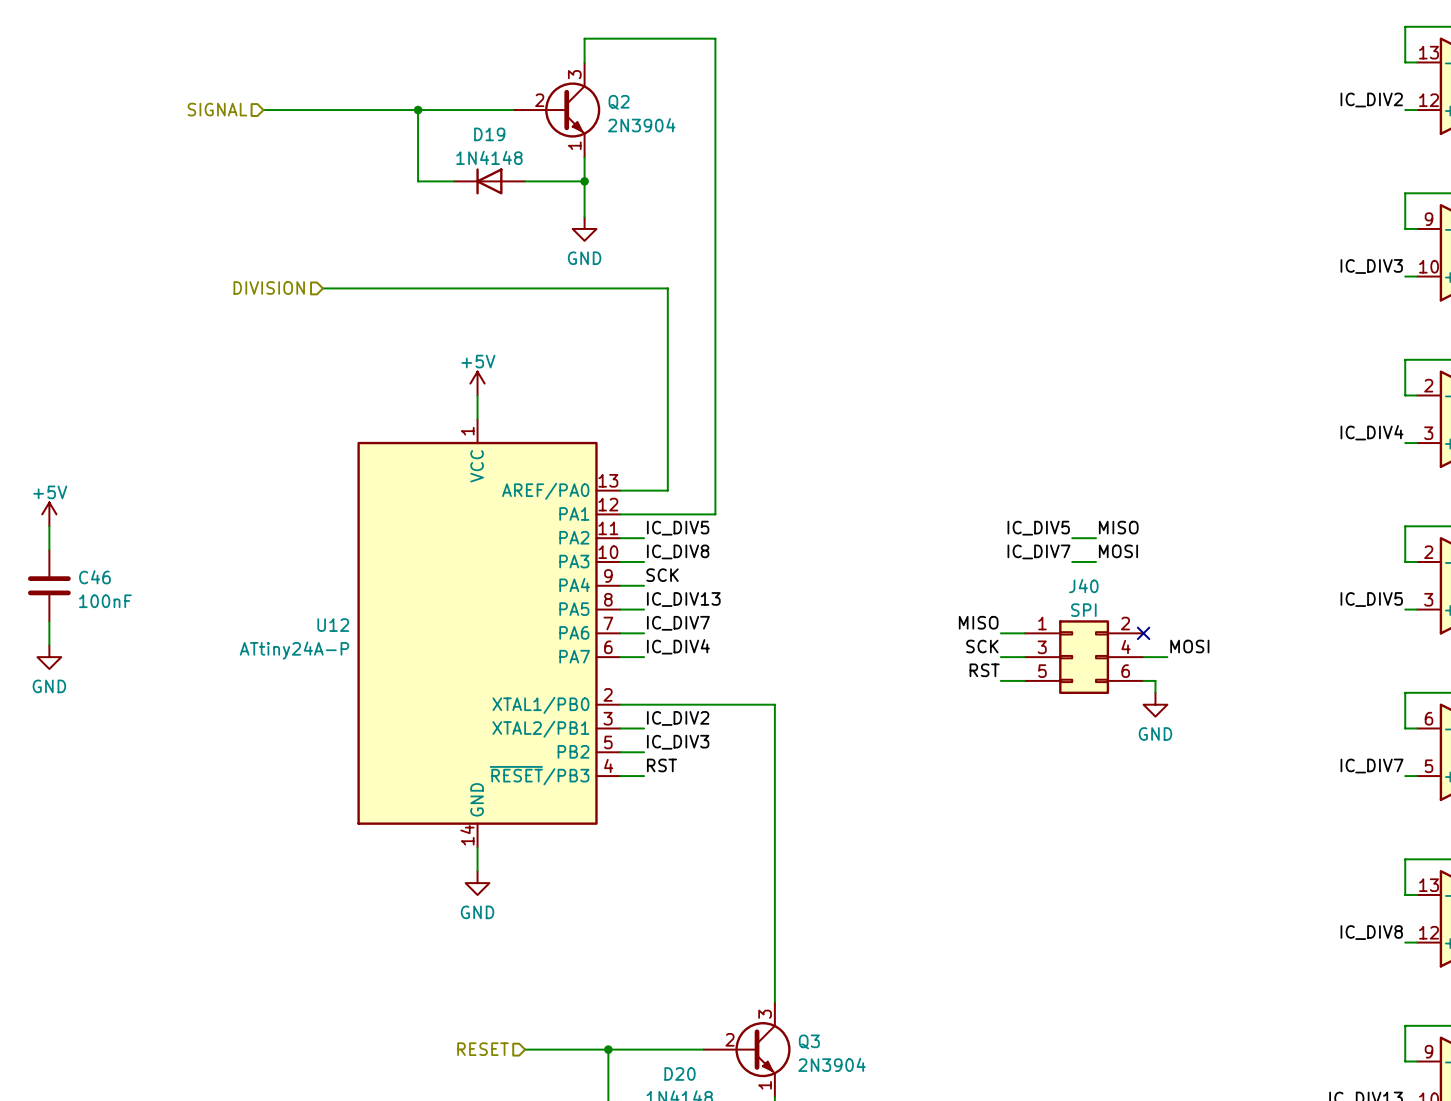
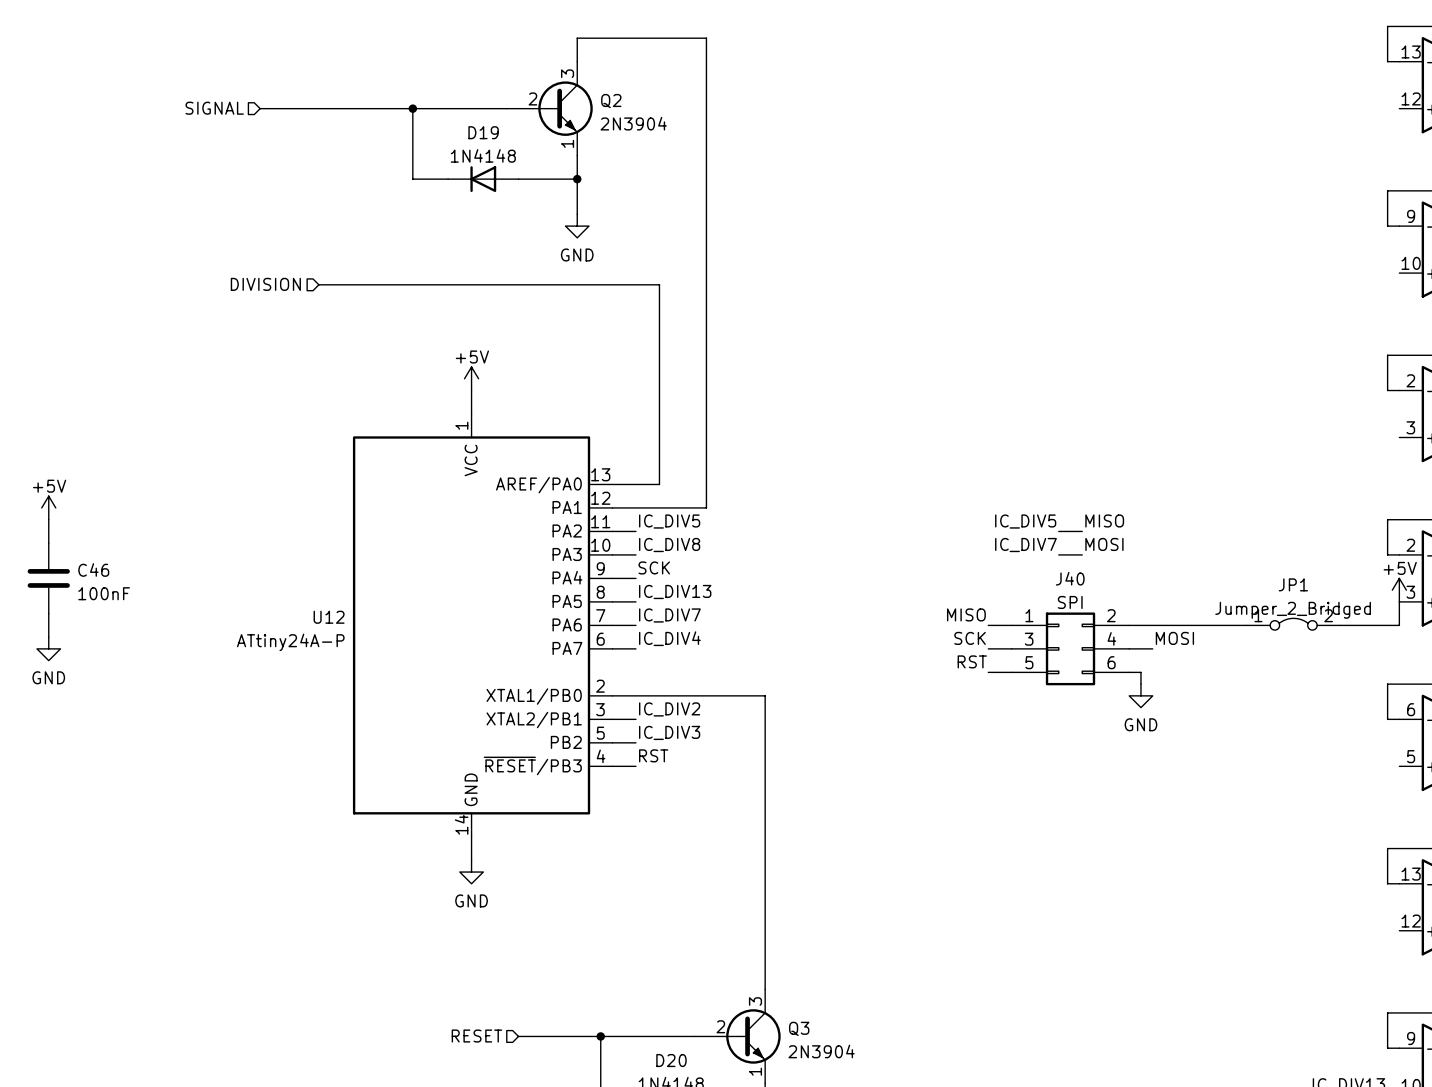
label: IC_DIV2 (1371, 99) -> none
wire: (1405, 110) (1417, 110) -> none
label: IC_DIV3 (1371, 266) -> none
wire: (1405, 276) (1417, 276) -> none
label: IC_DIV4 (1372, 432) -> none
wire: (1405, 443) (1417, 443) -> none
power symbol: none -> +5V (1399, 590)
label: IC_DIV5 (1371, 599) -> none
wire: (1405, 609) (1417, 609) -> (1340, 625) (1399, 625) (1399, 601)
JP1: none -> Jumper_2_Bridged (1293, 624)
wire: none -> (1129, 625) (1246, 625)
no-connect mark: (1143, 633) -> none
label: IC_DIV7 (1372, 766) -> none
wire: (1405, 776) (1417, 776) -> none
label: IC_DIV8 (1371, 932) -> none
wire: (1405, 942) (1417, 942) -> none

